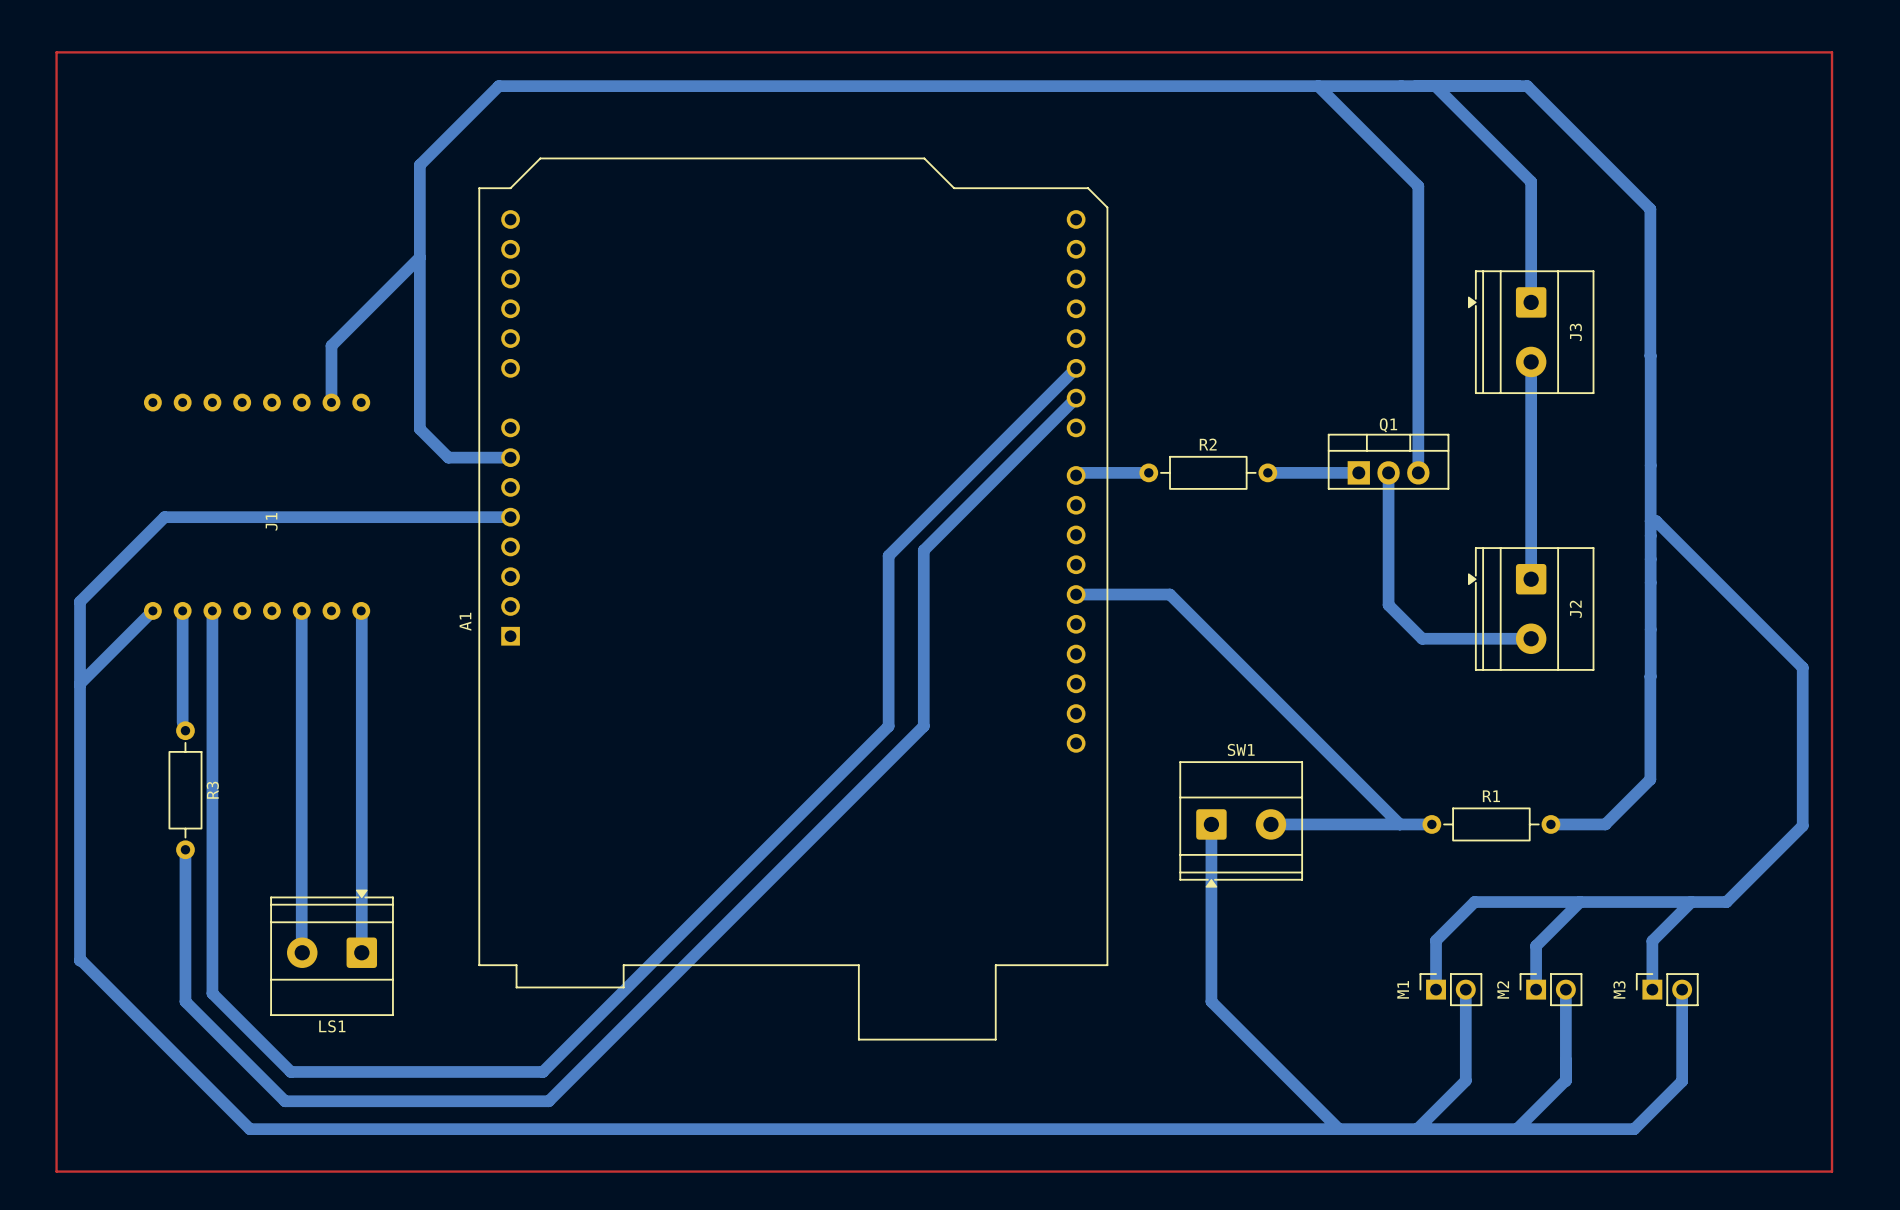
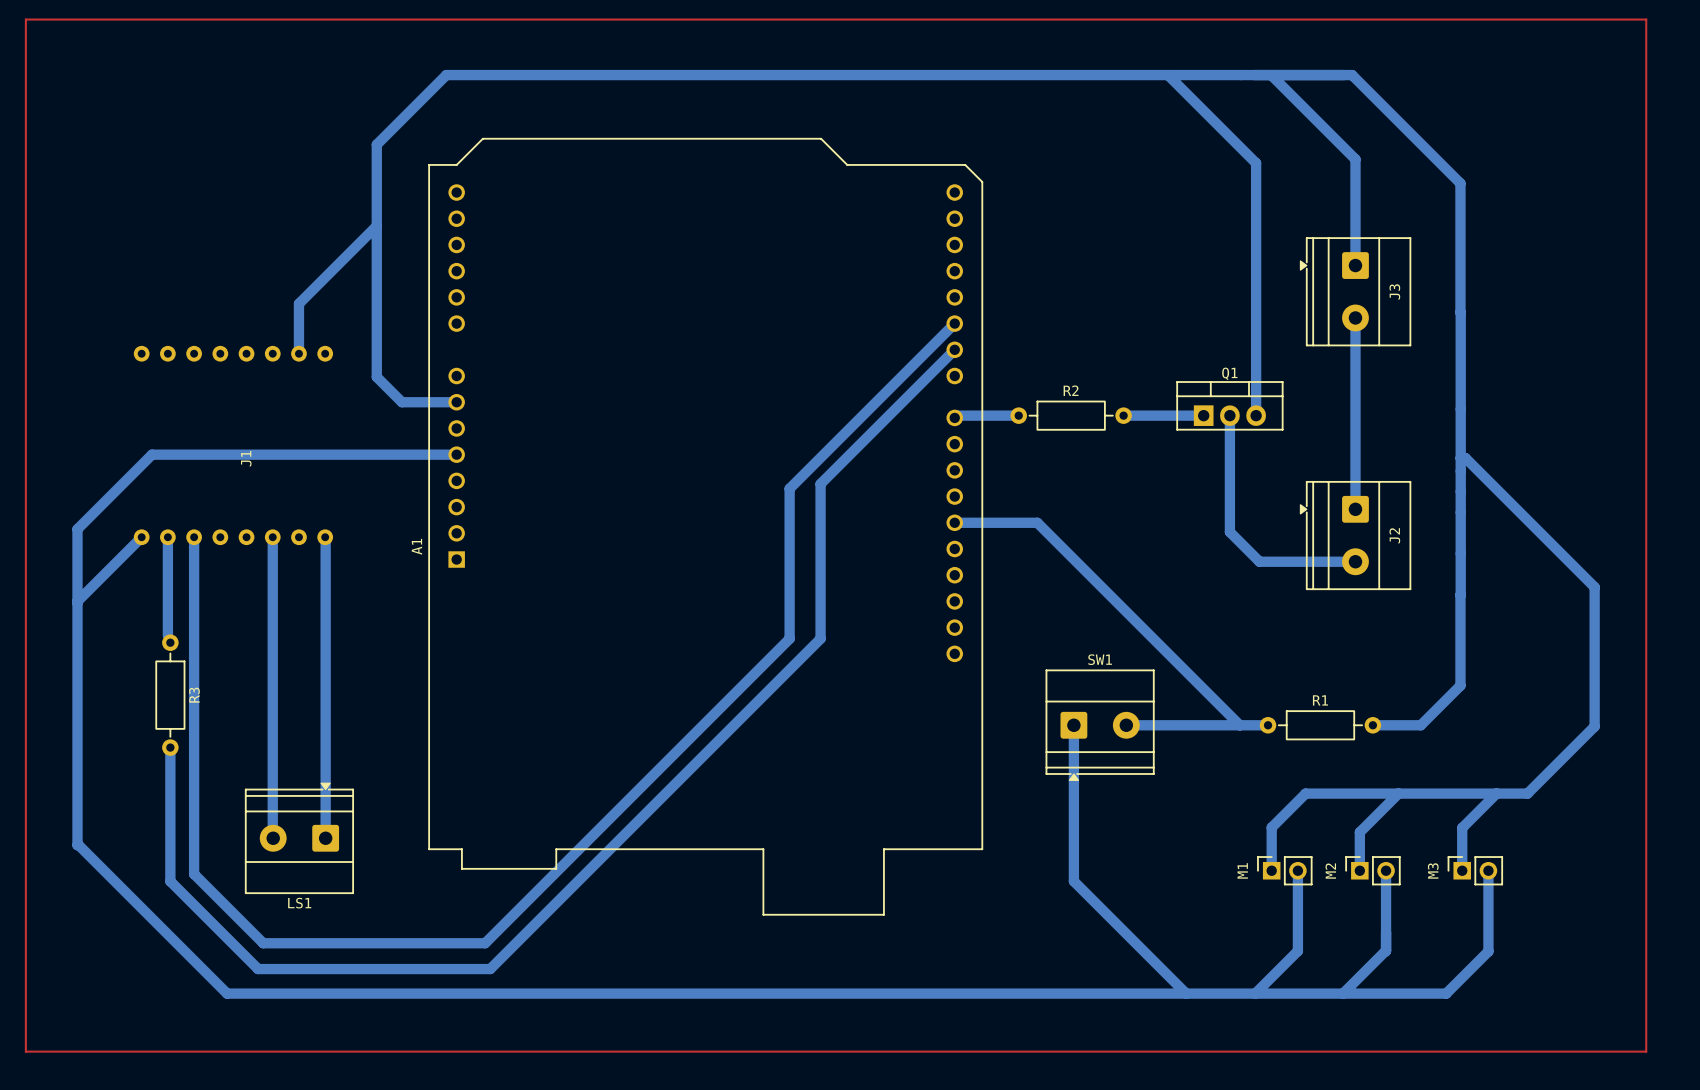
top track: (56, 52) (1832, 52) (1832, 1171) (56, 1171) (56, 52) -> (25, 19) (25, 1051) (1646, 1051) (1646, 19) (25, 19)

